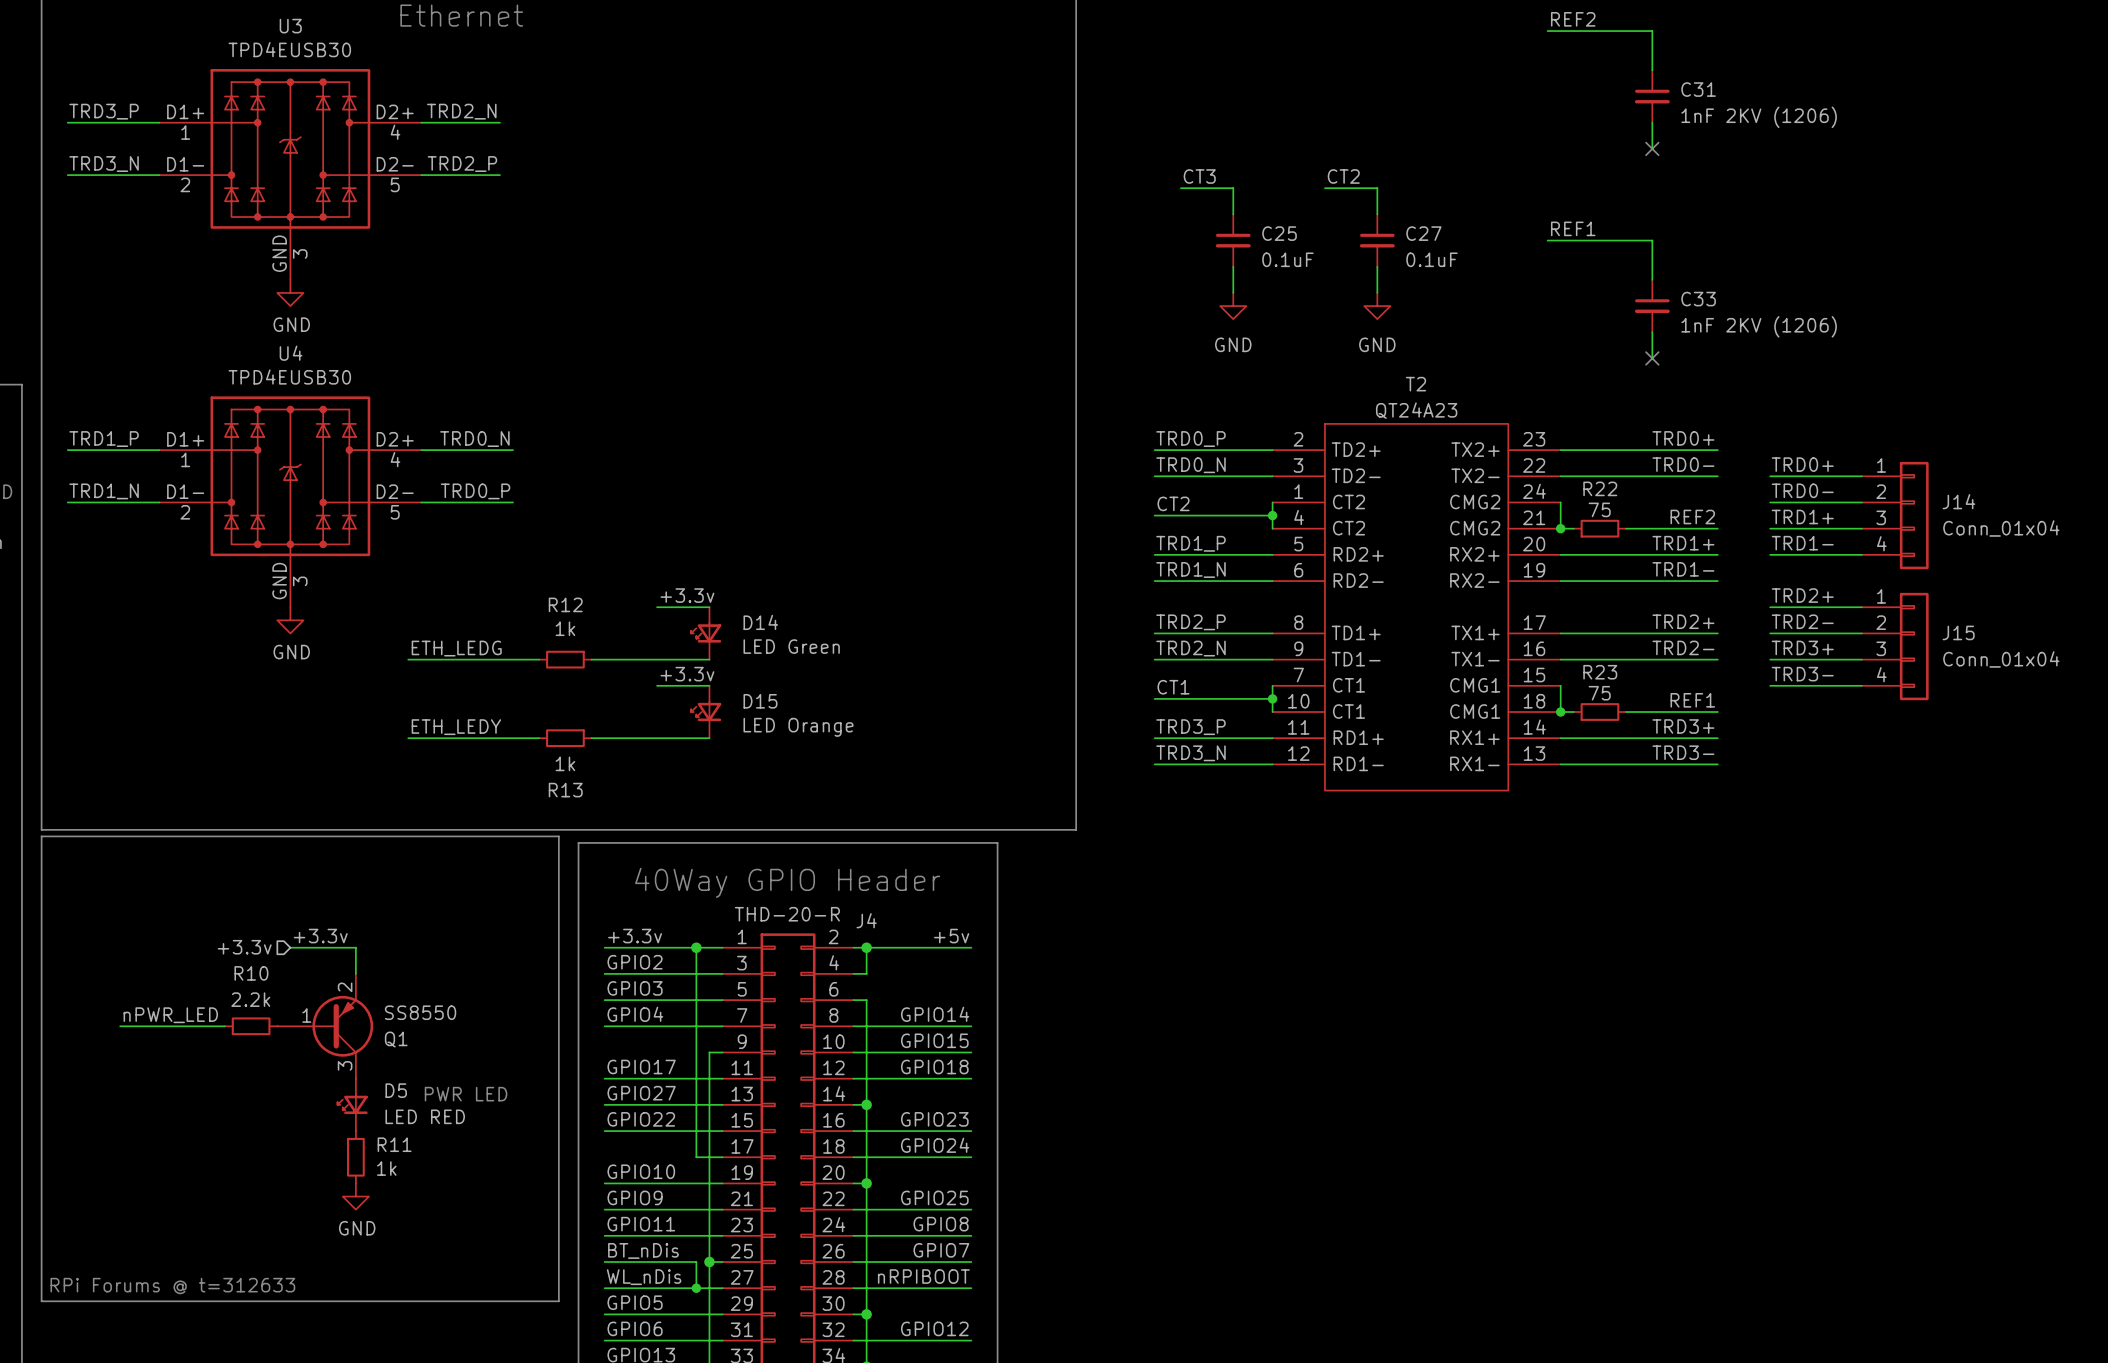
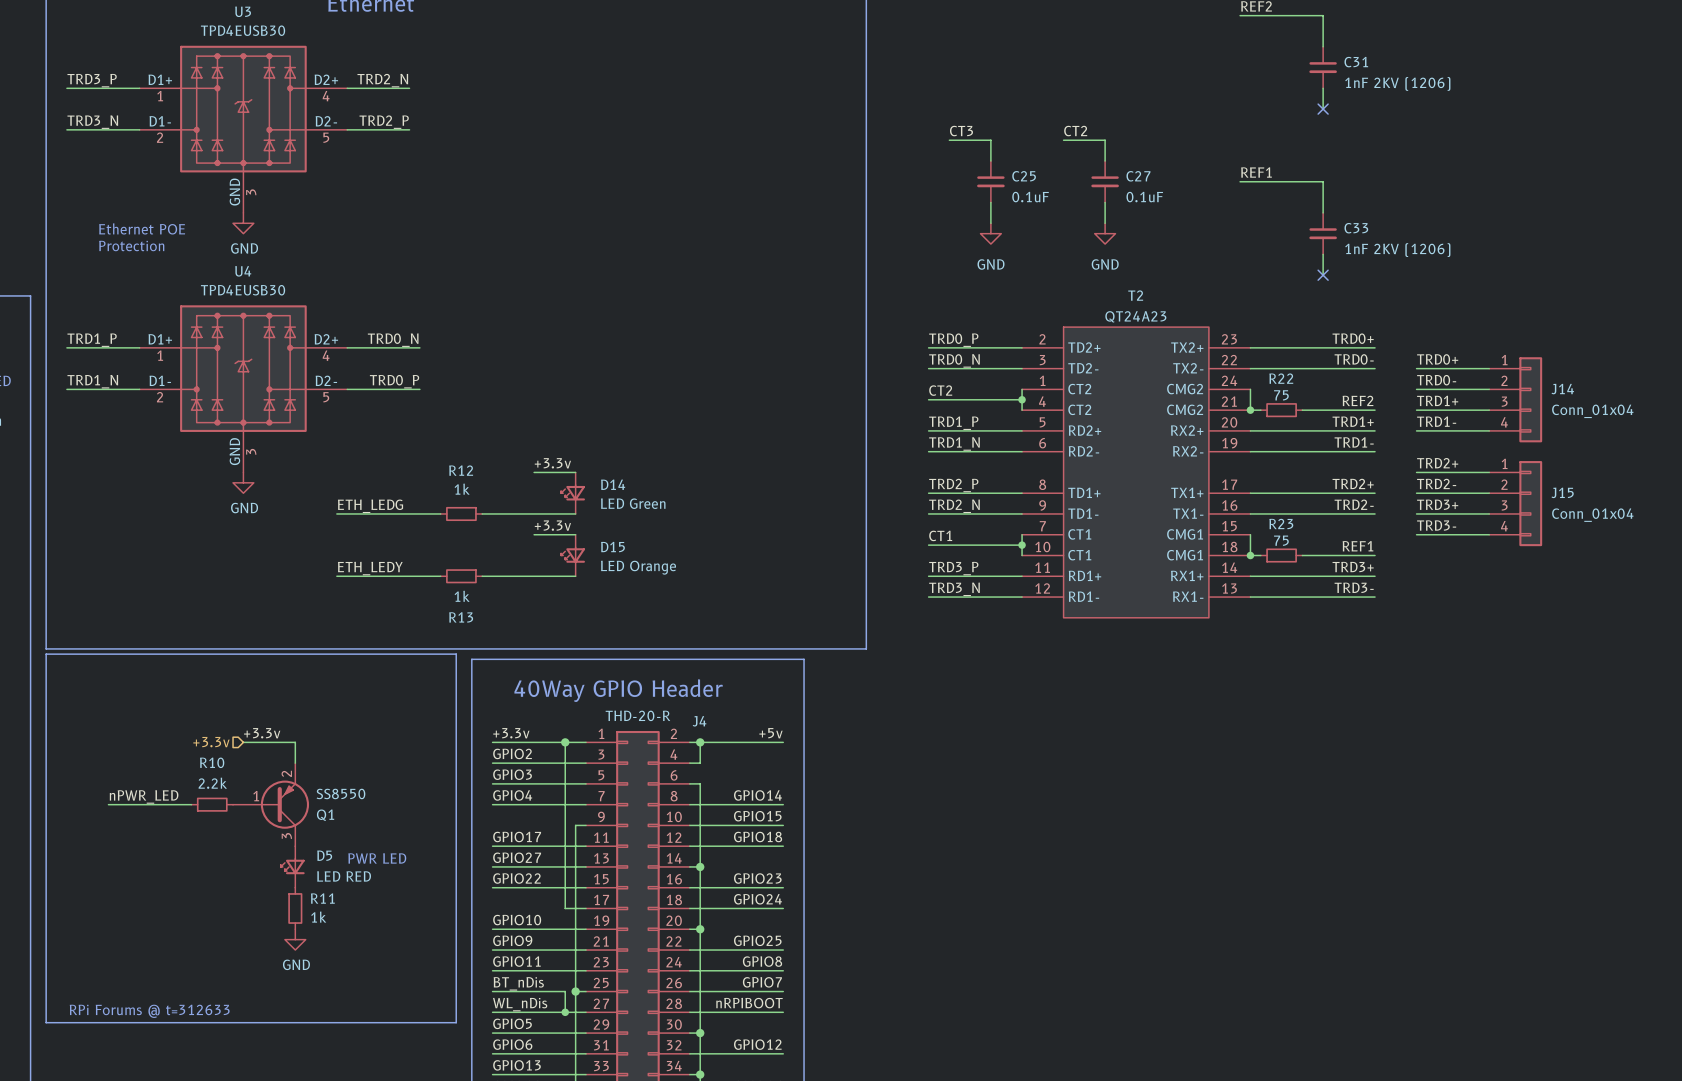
text: none -> Ethernet POE (142, 228)
text: none -> Protection (131, 246)

